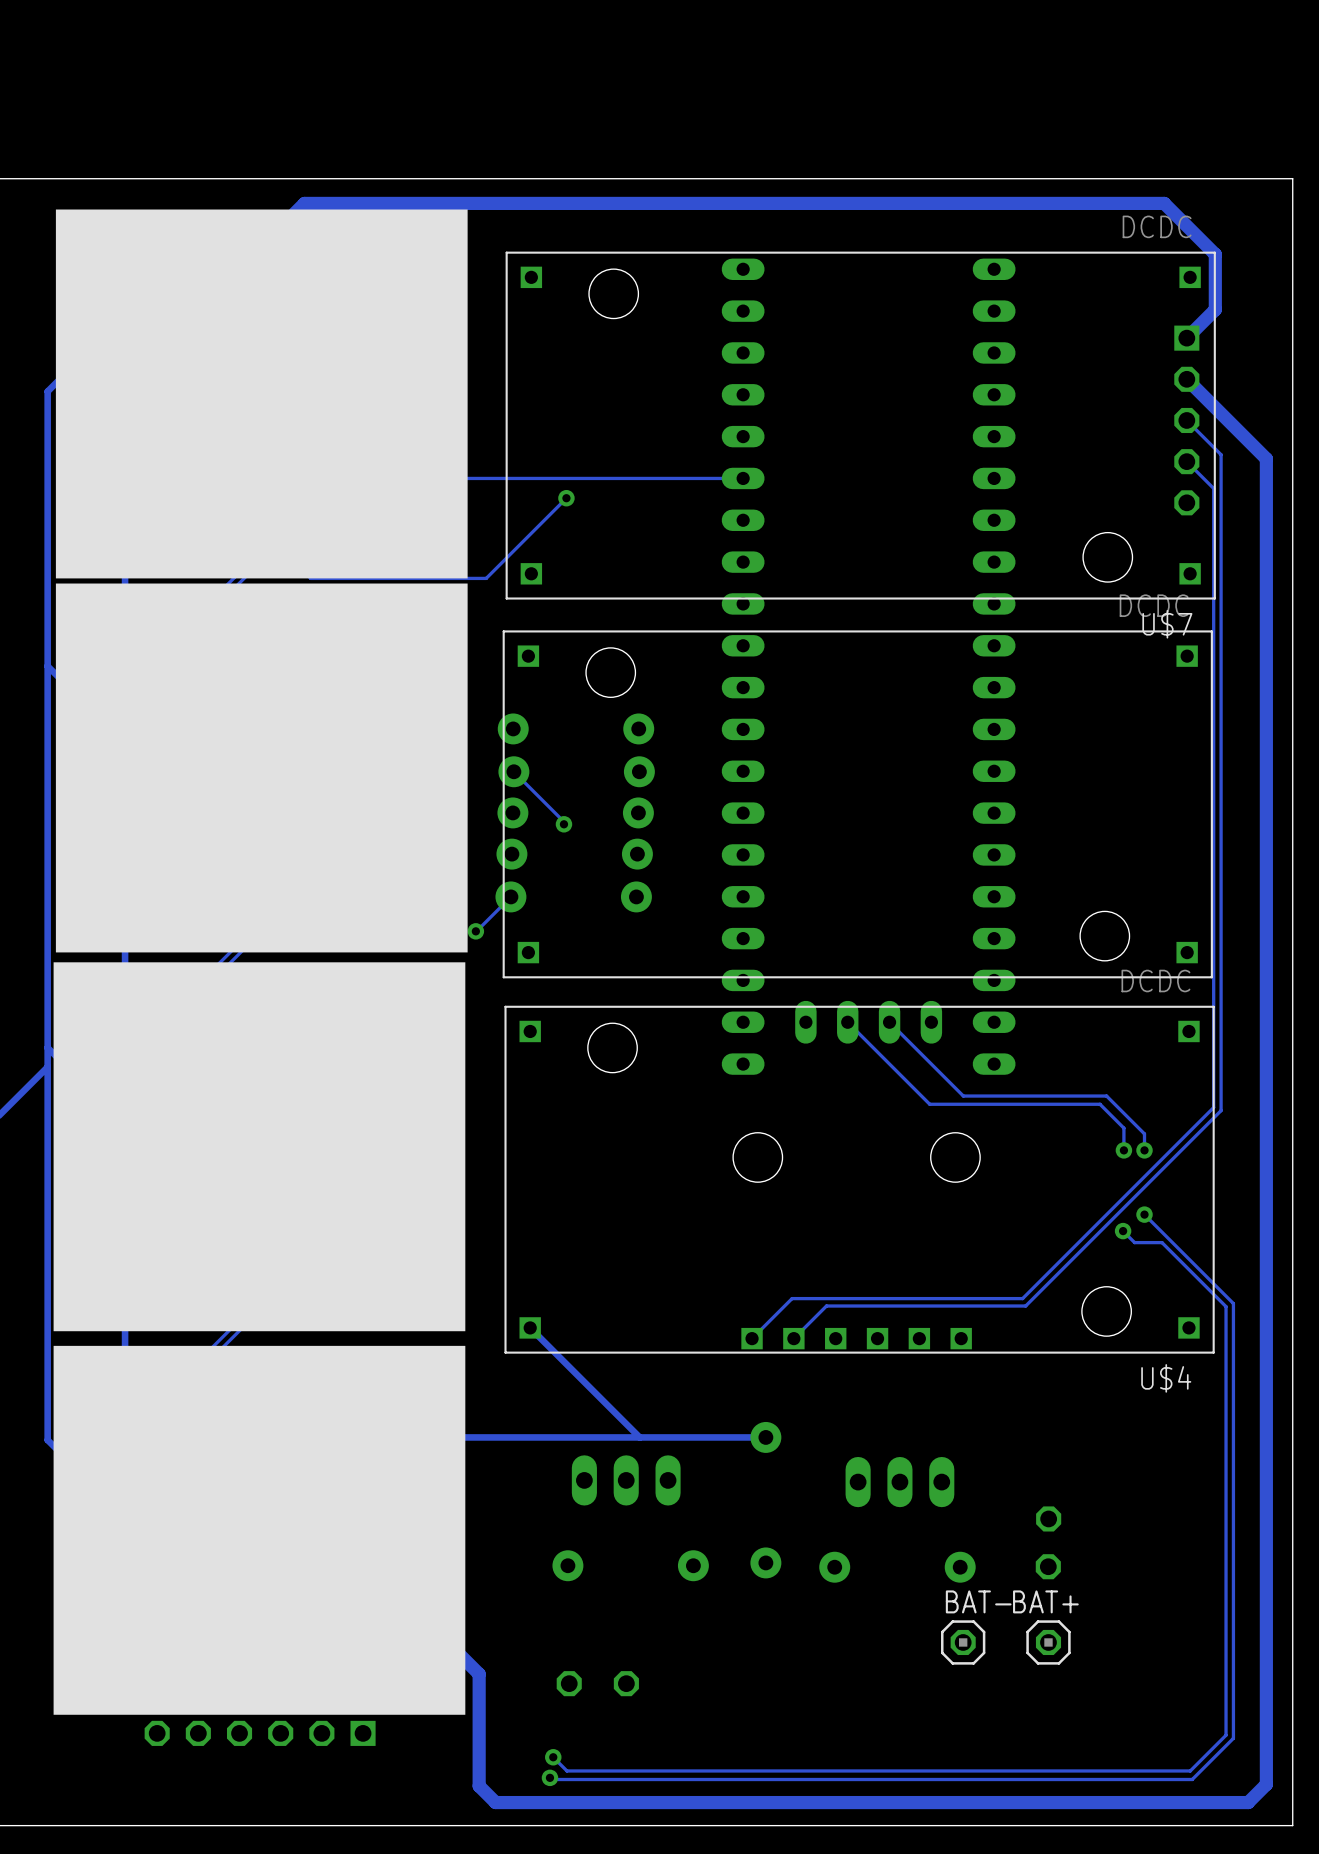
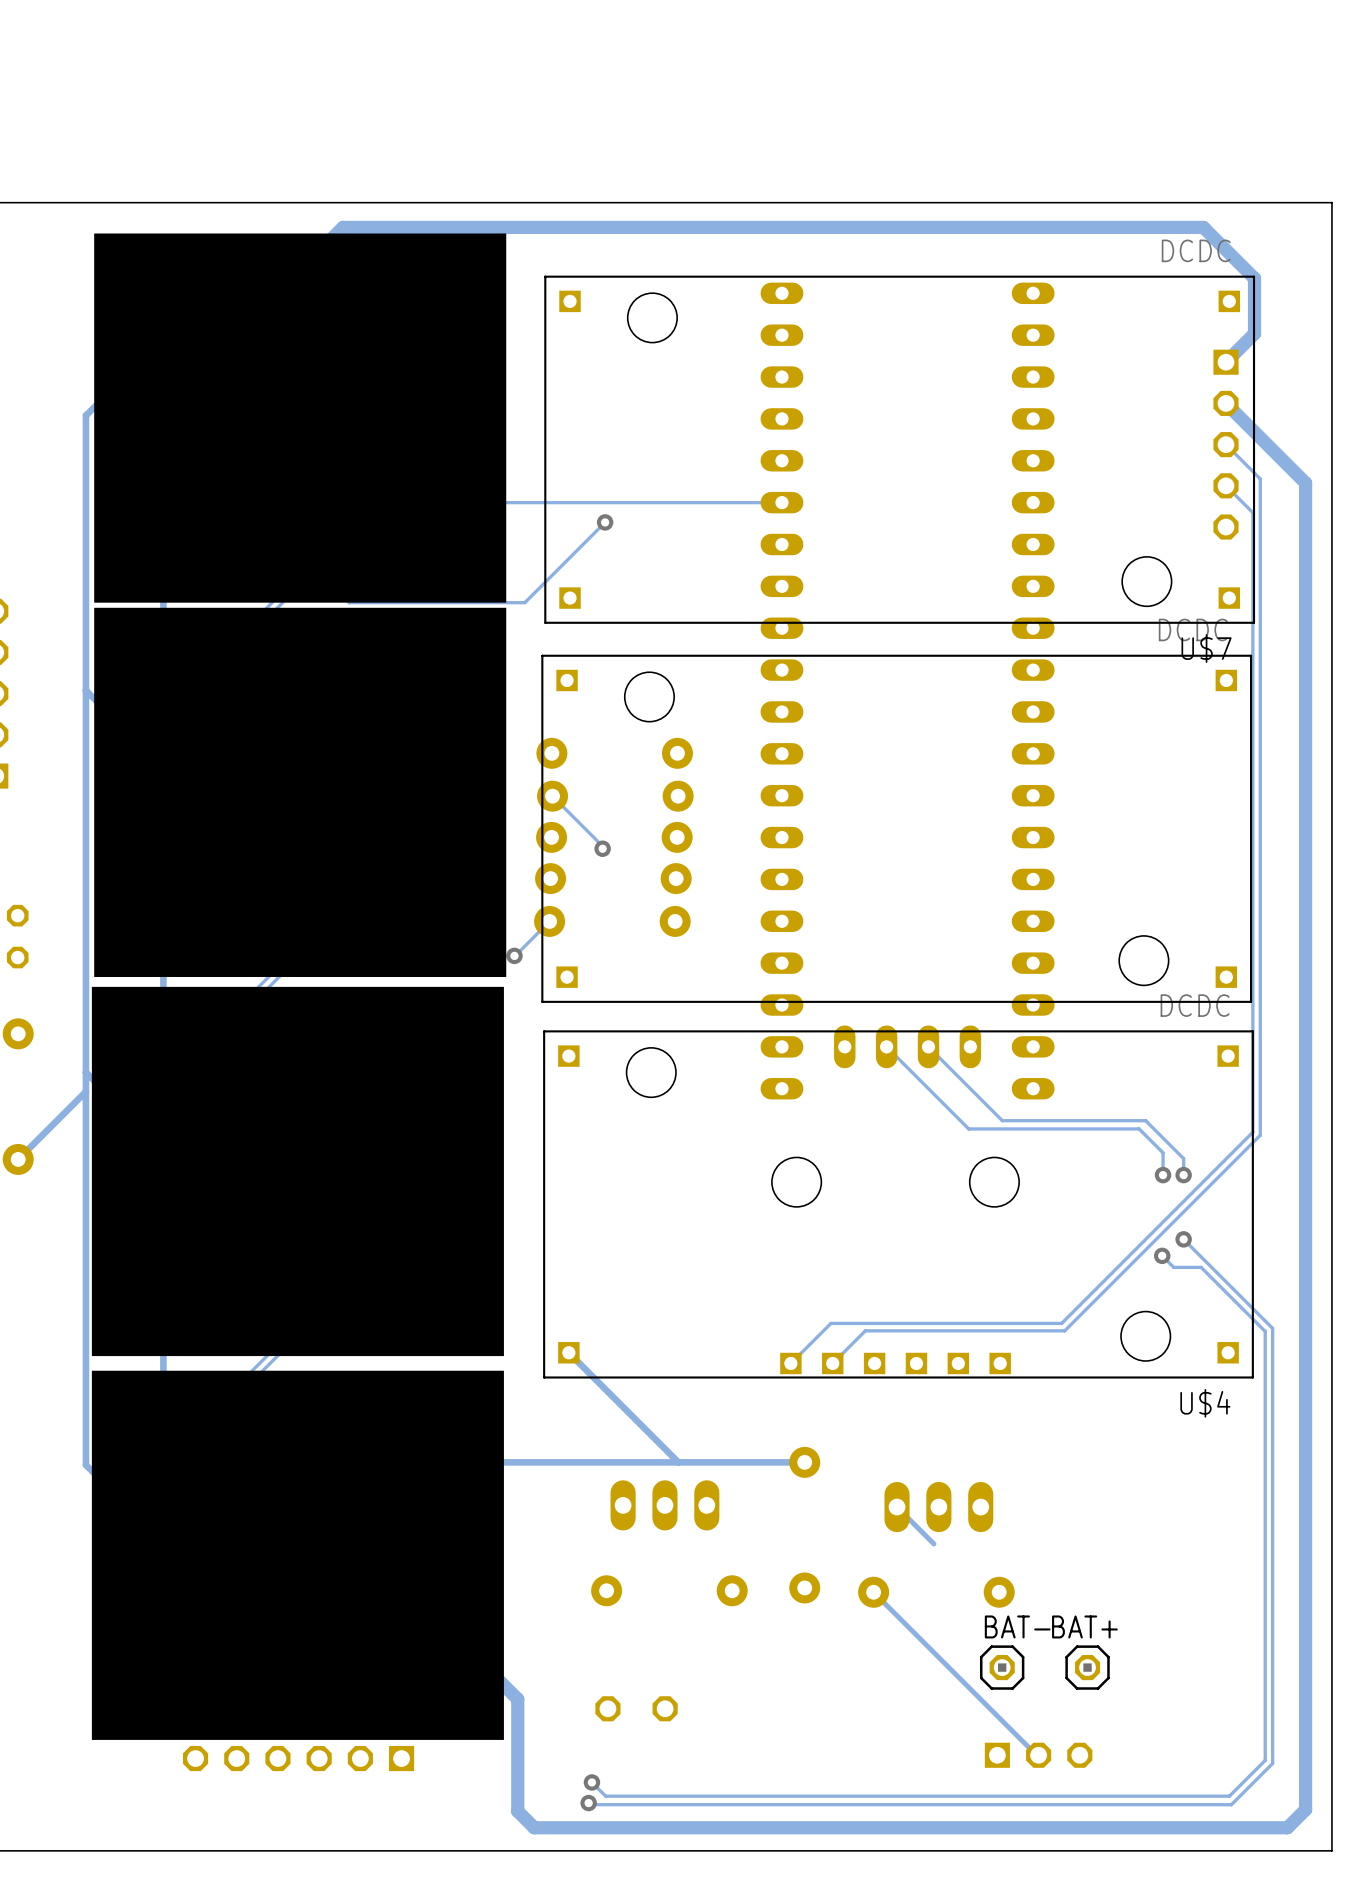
track: none -> (897, 1507) (933, 1543)
part: (1048, 1518) -> none
part: (1048, 1566) -> none
track: none -> (873, 1592) (1038, 1755)
part: none -> (1038, 1755)

